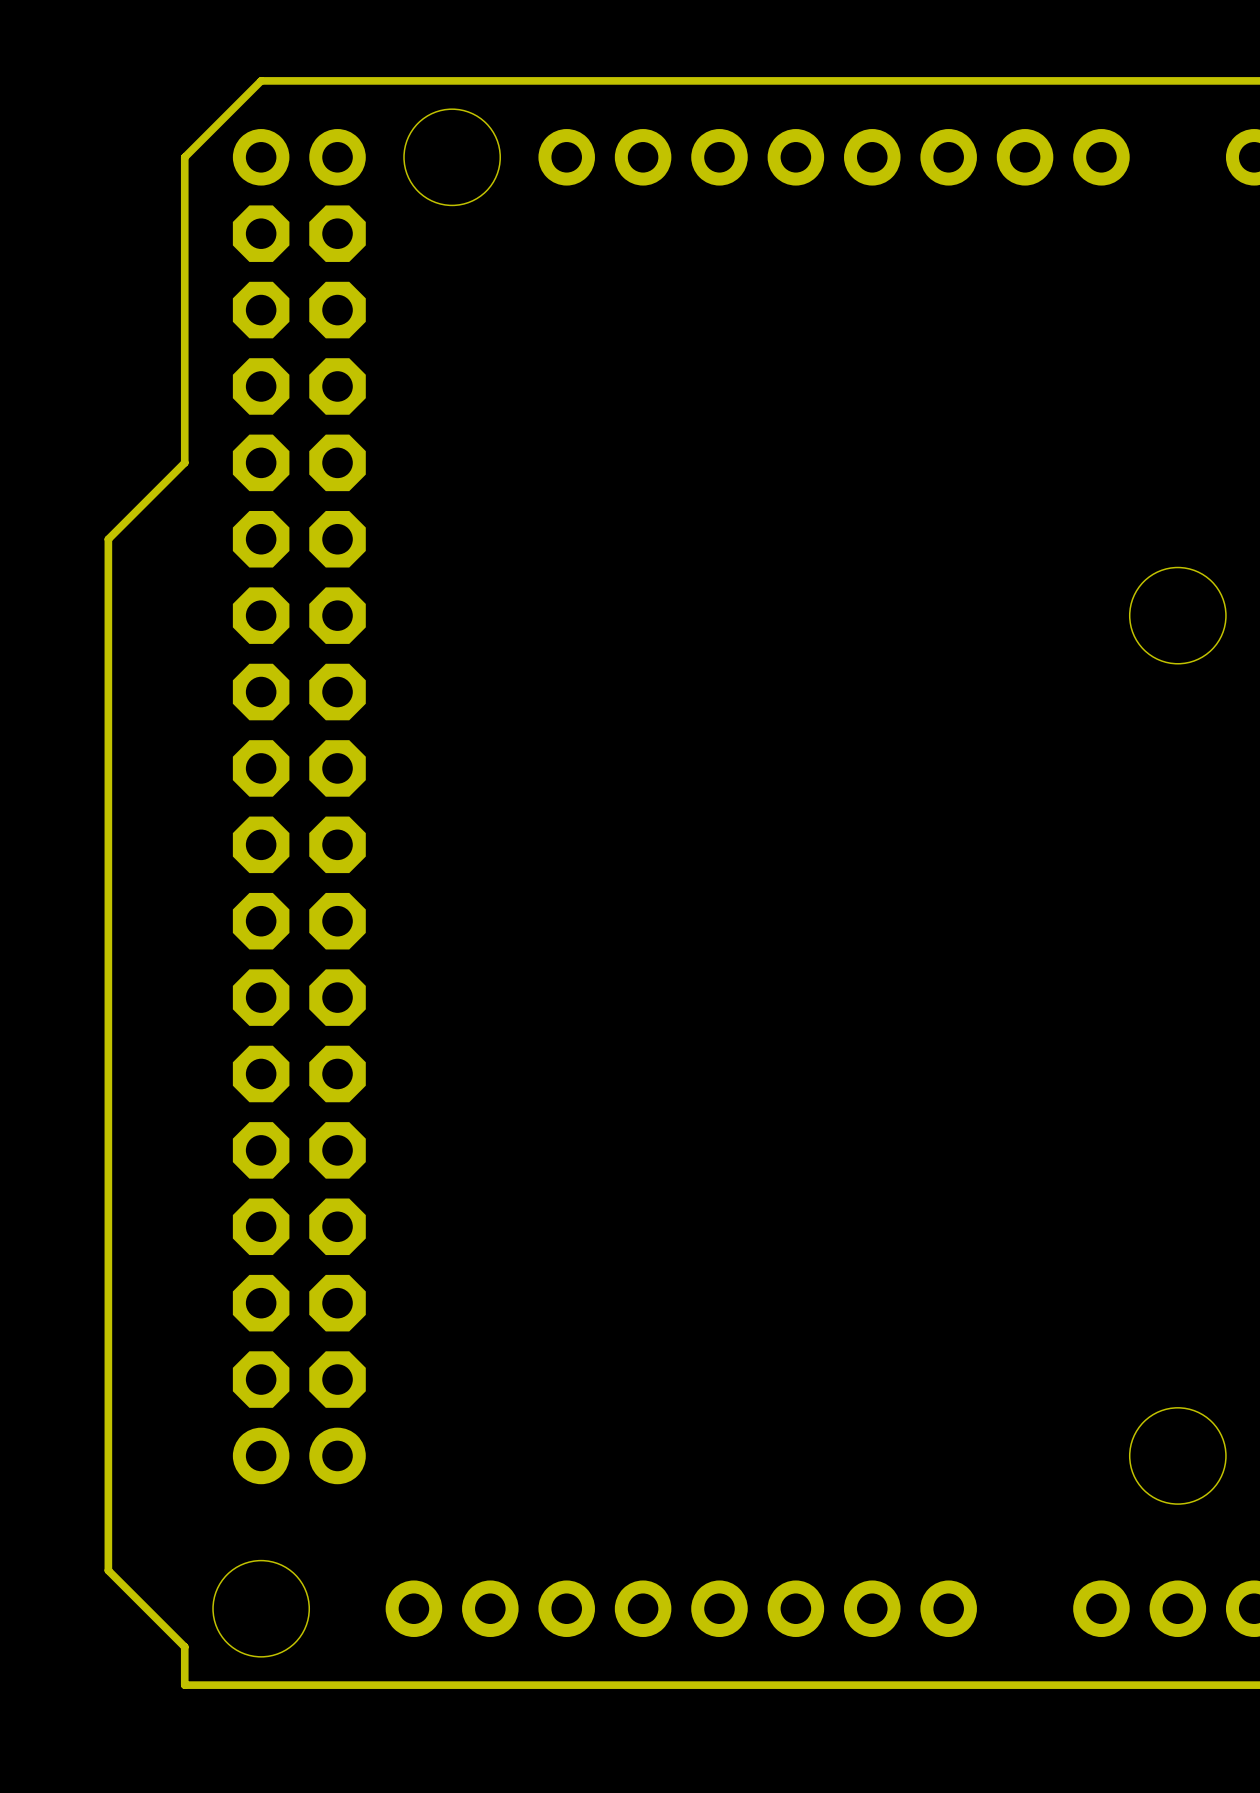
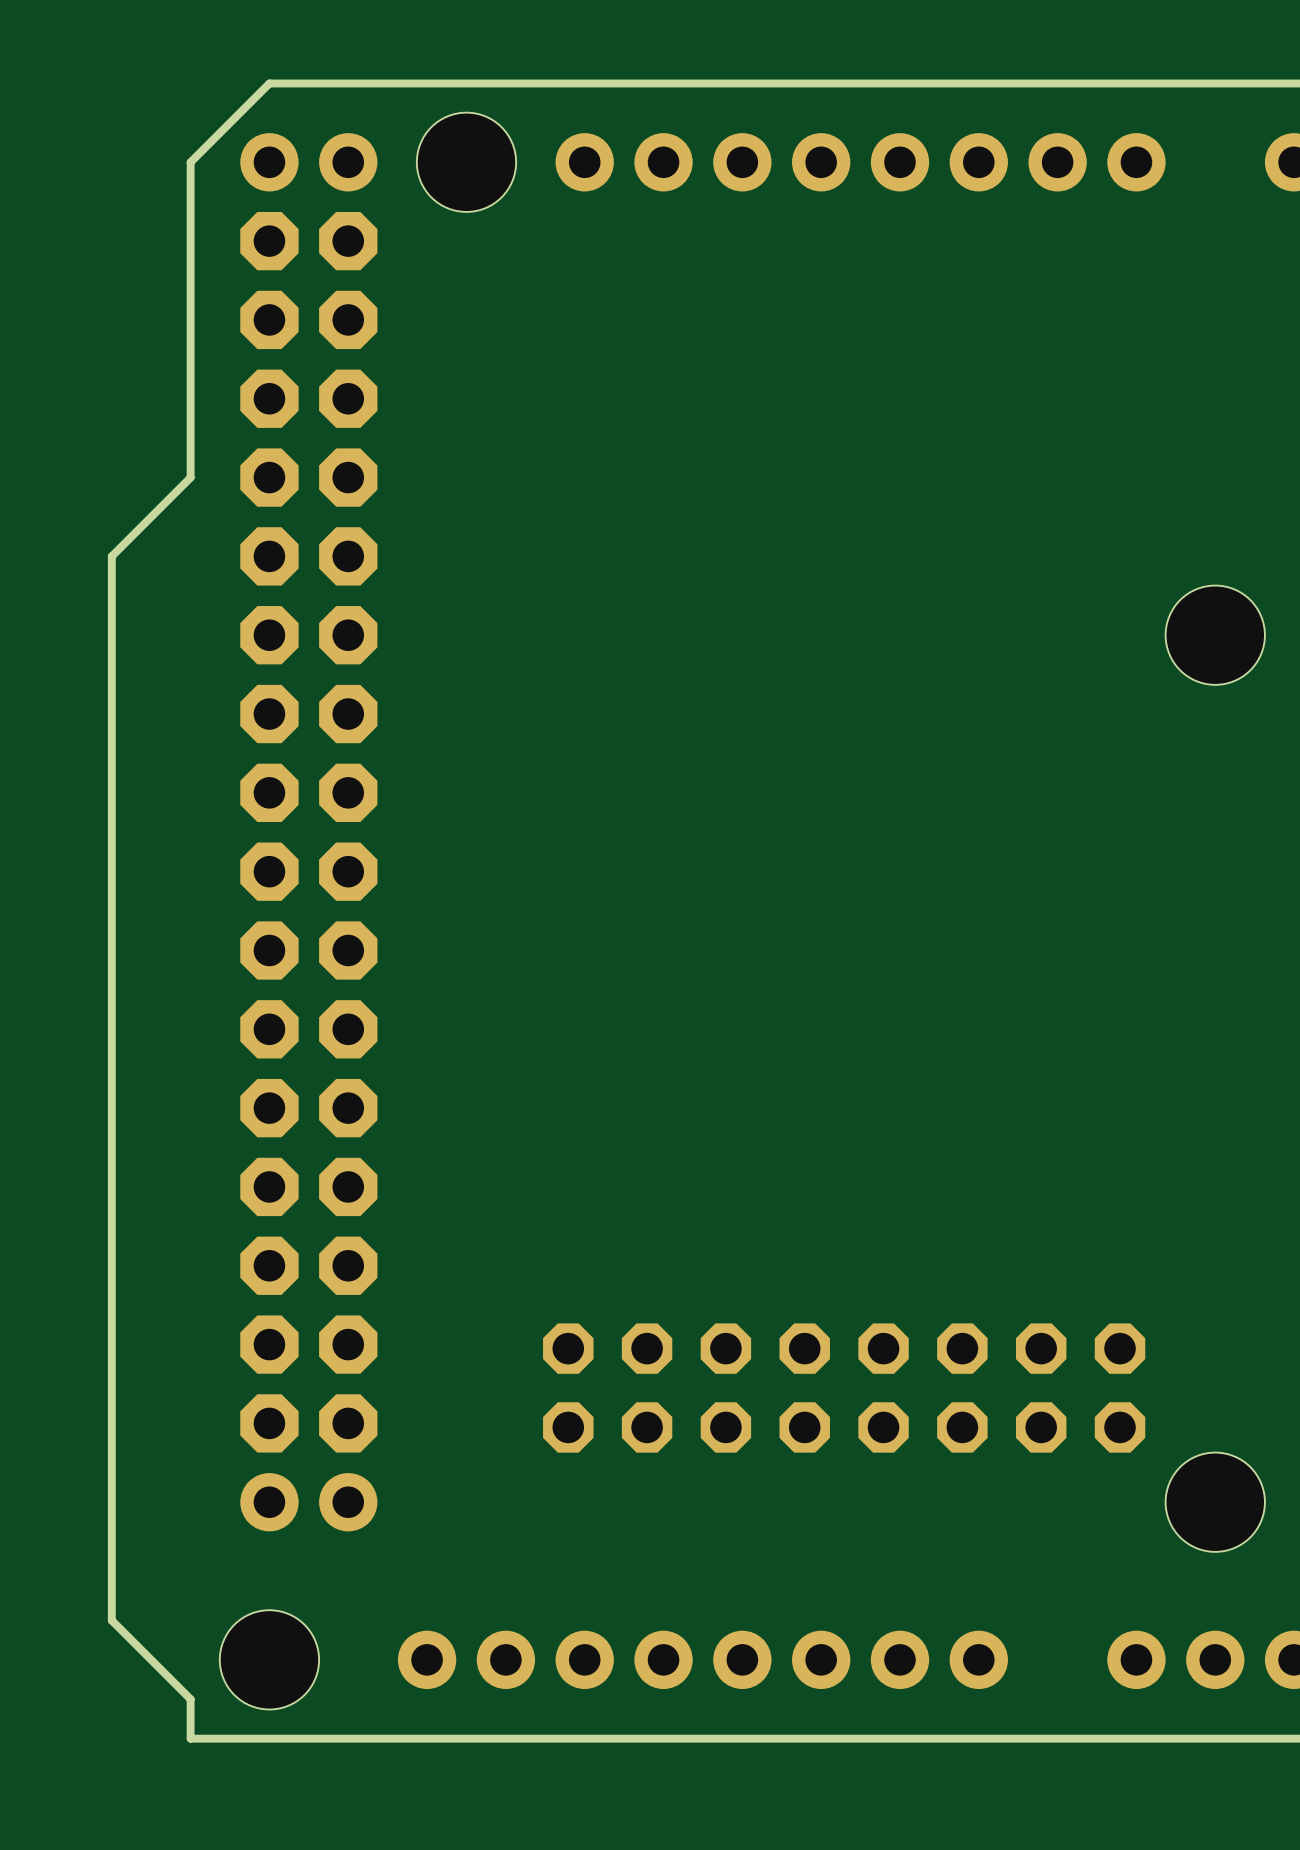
part: none -> (844, 1388)

